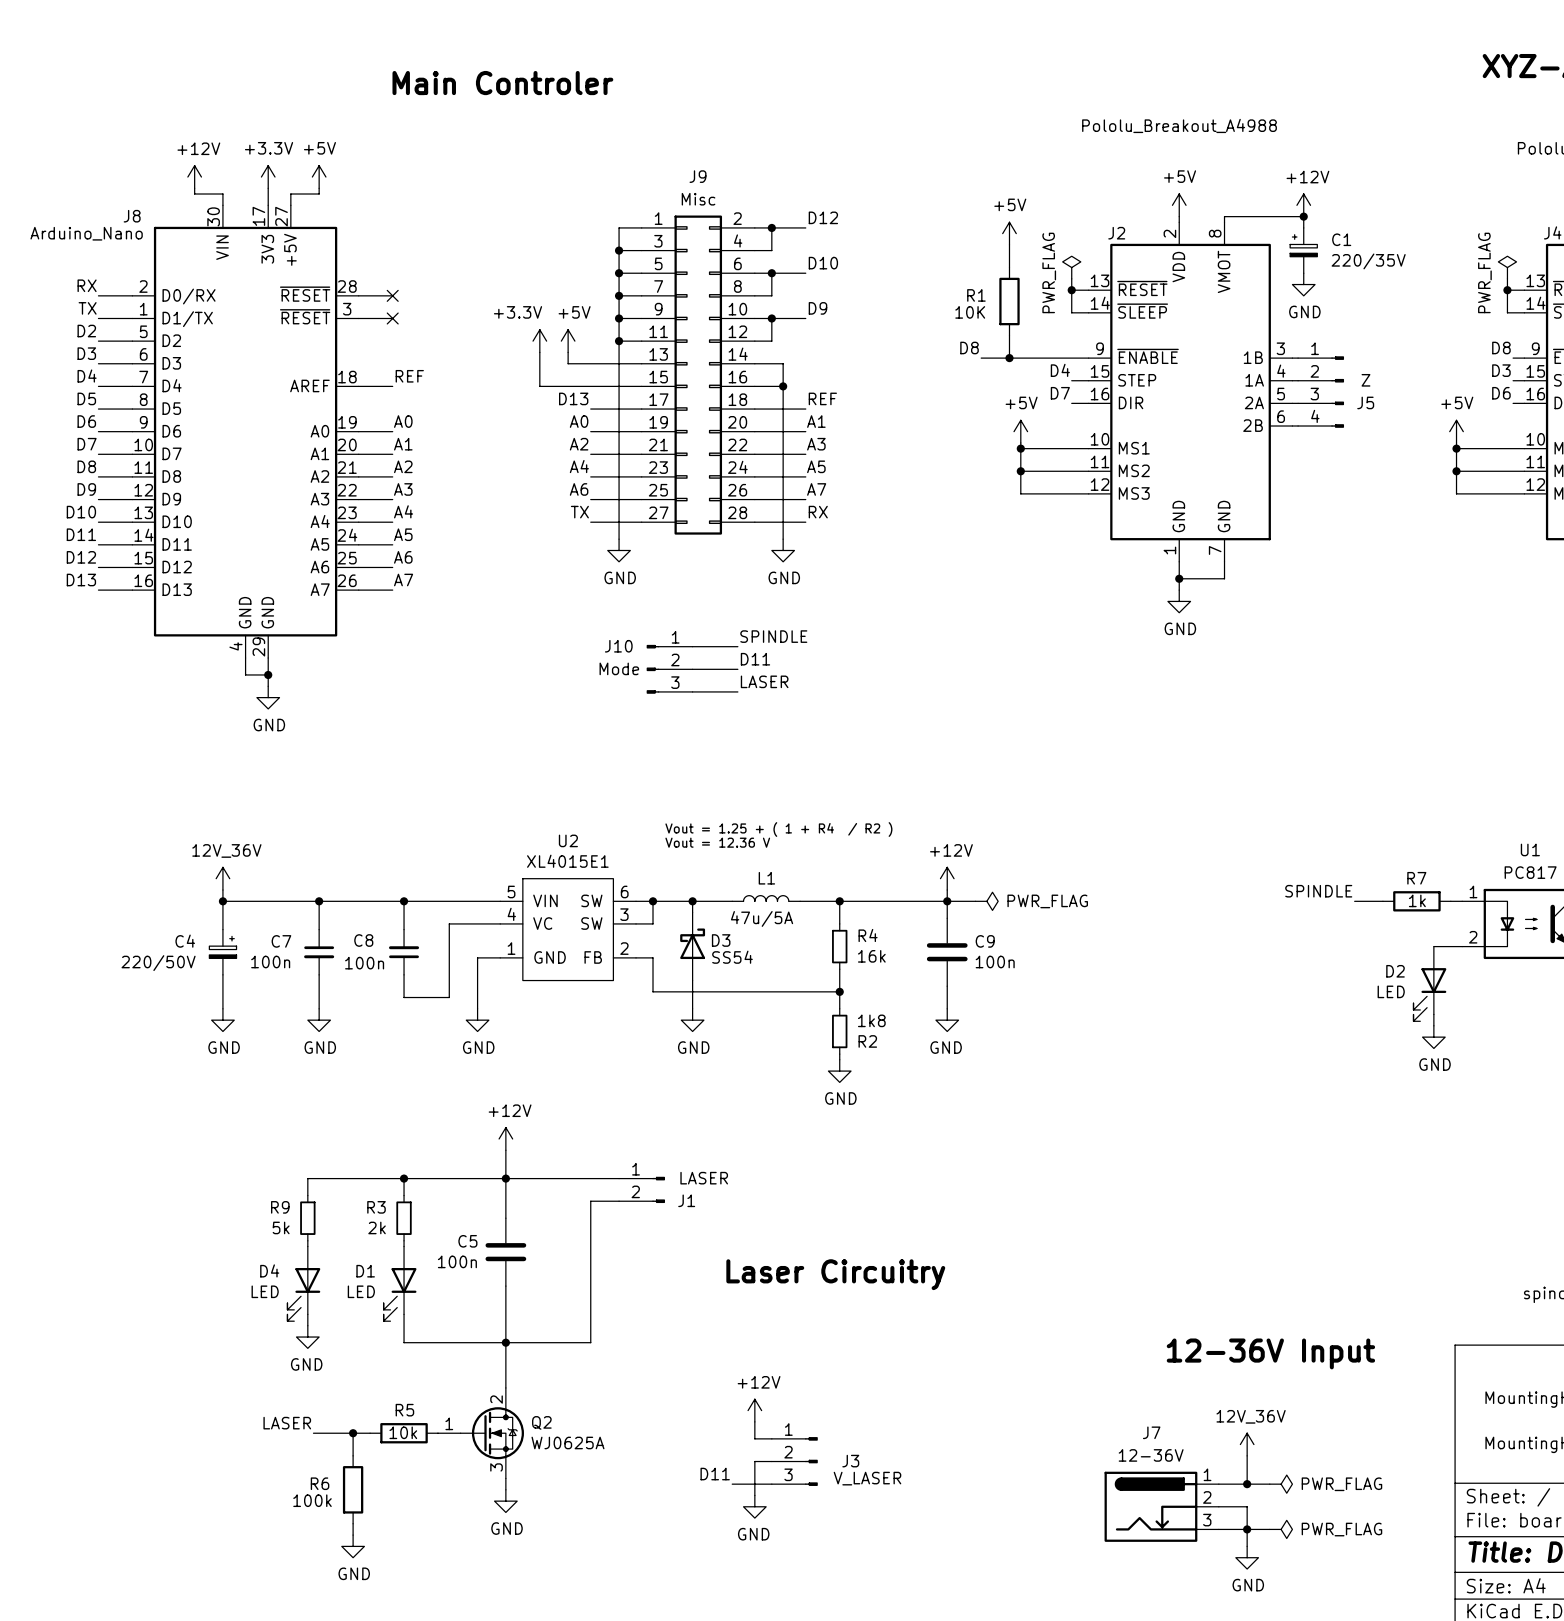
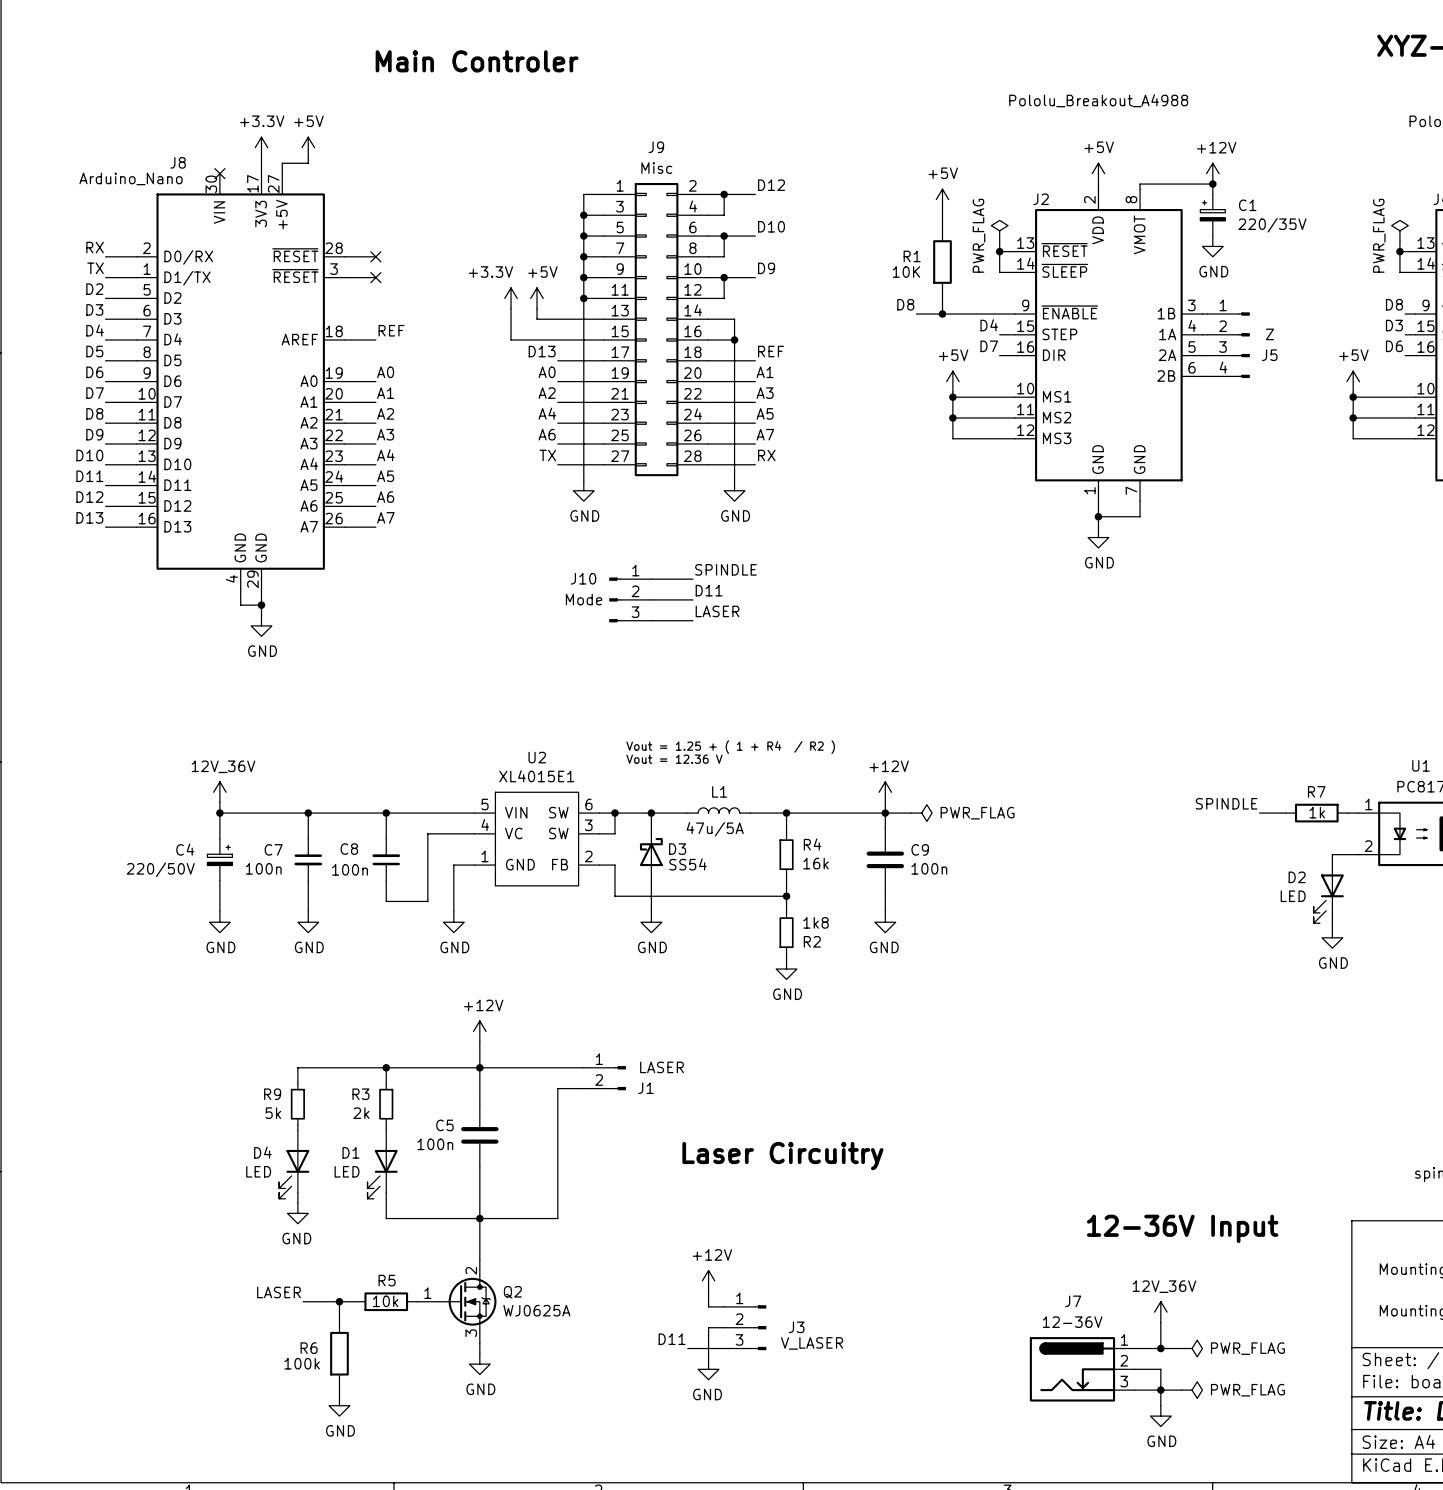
power symbol: +12V (194, 177) -> none
wire: (194, 188) (194, 194) (222, 194) (222, 205) -> none
no-connect mark: none -> (219, 173)
J8 name position: J8 (132, 216) -> J8 (178, 162)
J8 value position: Arduino_Nano (86, 233) -> Arduino_Nano (131, 178)

